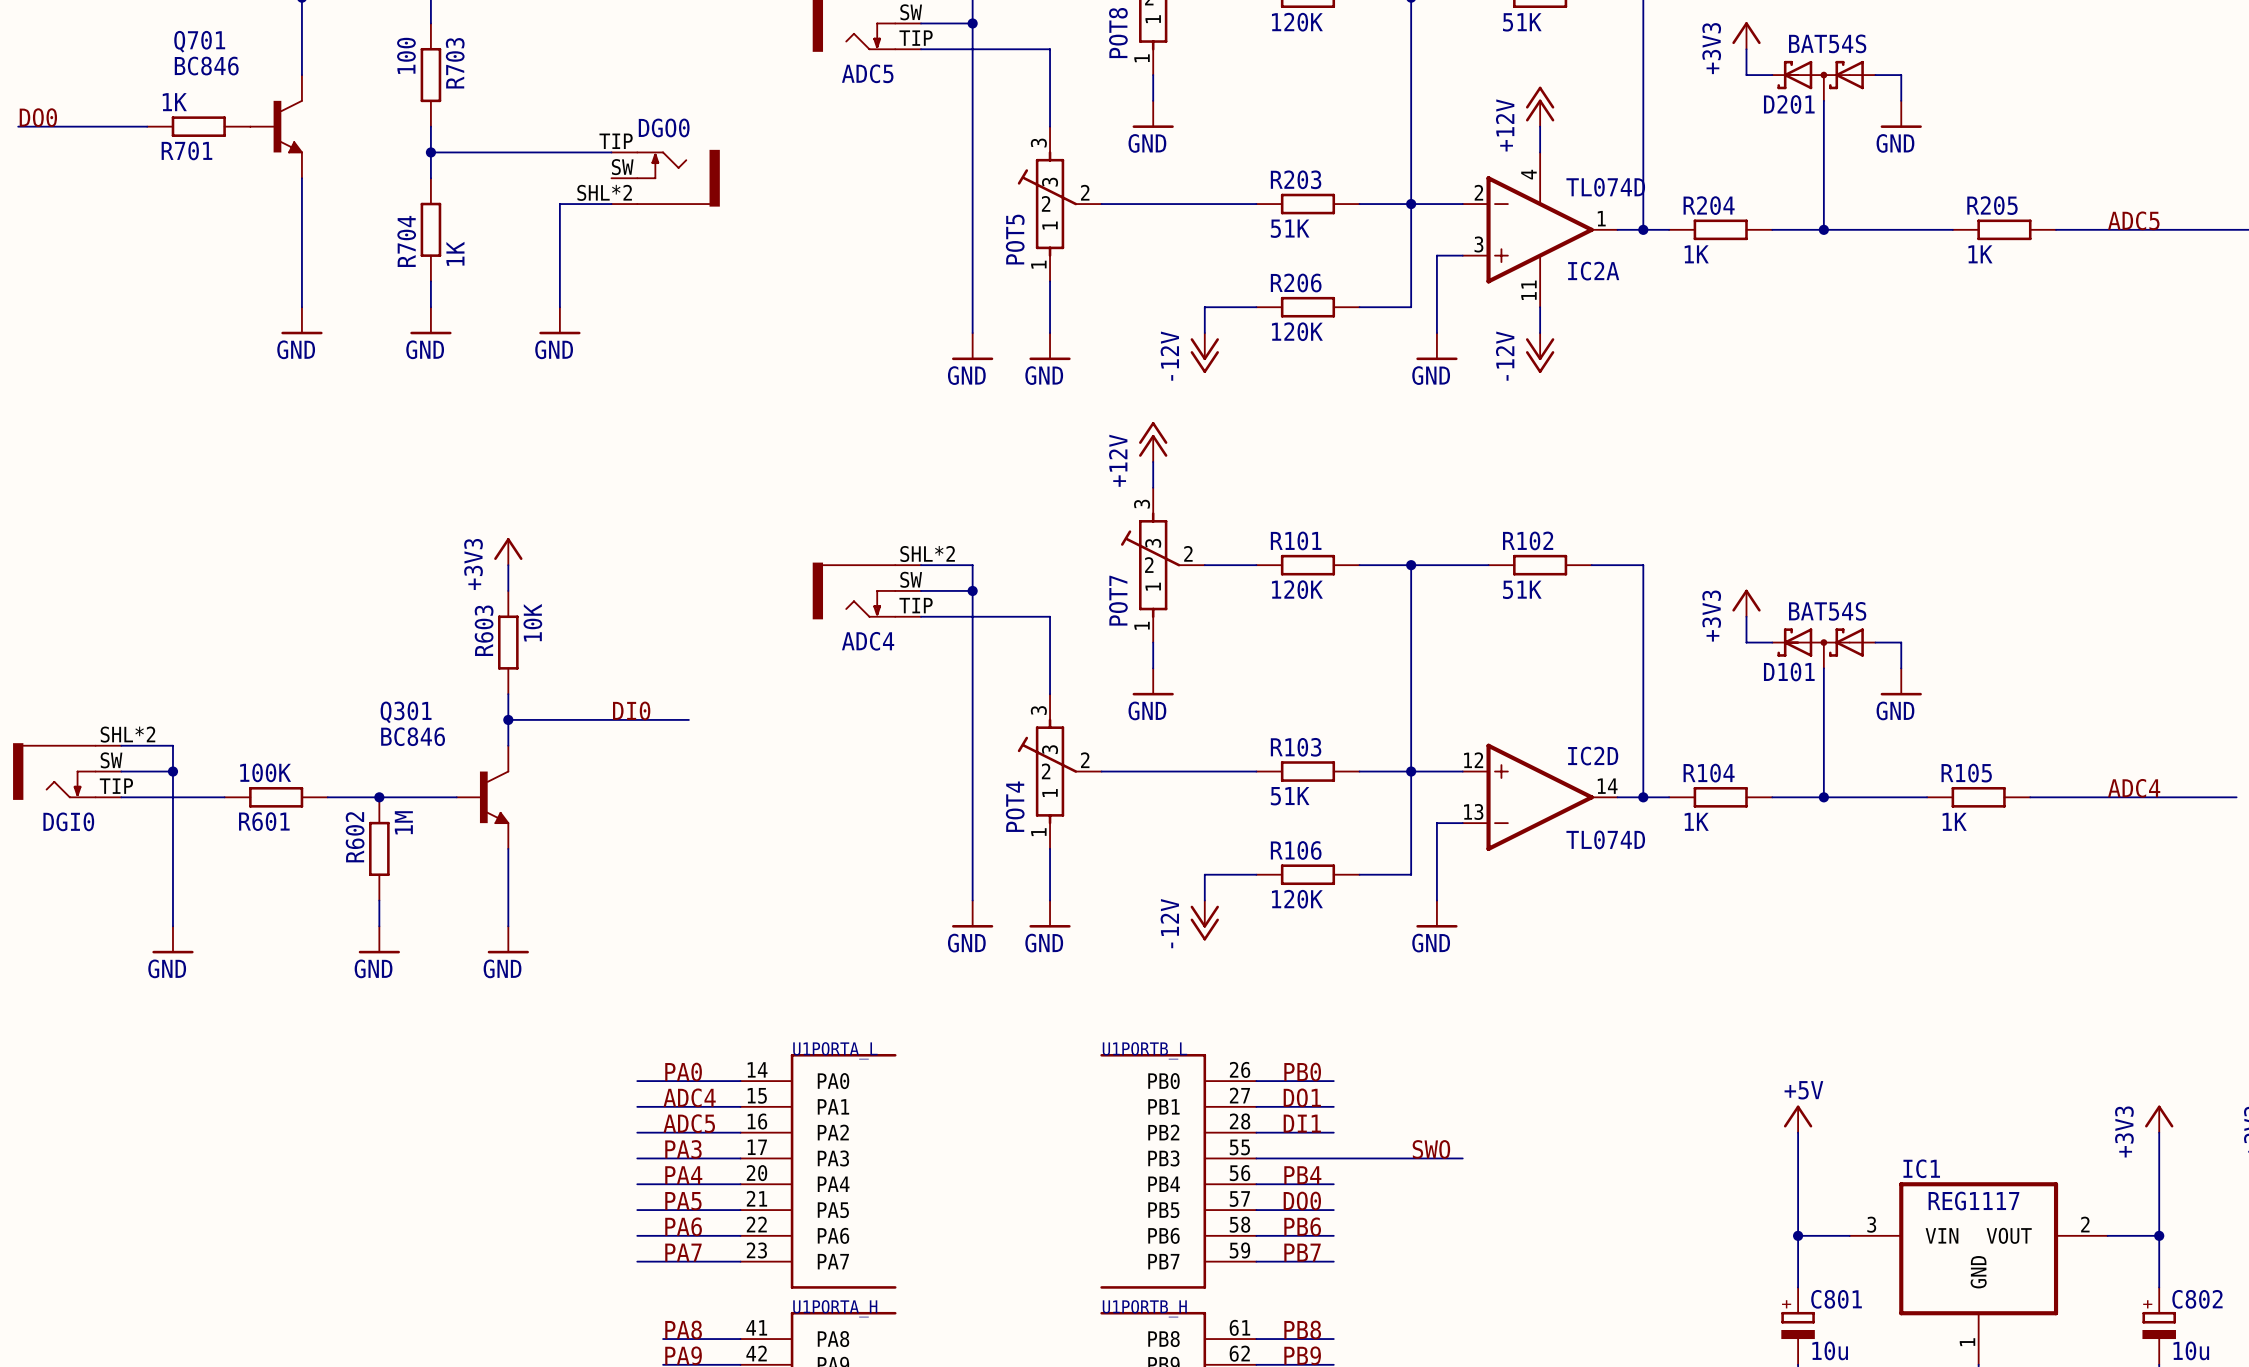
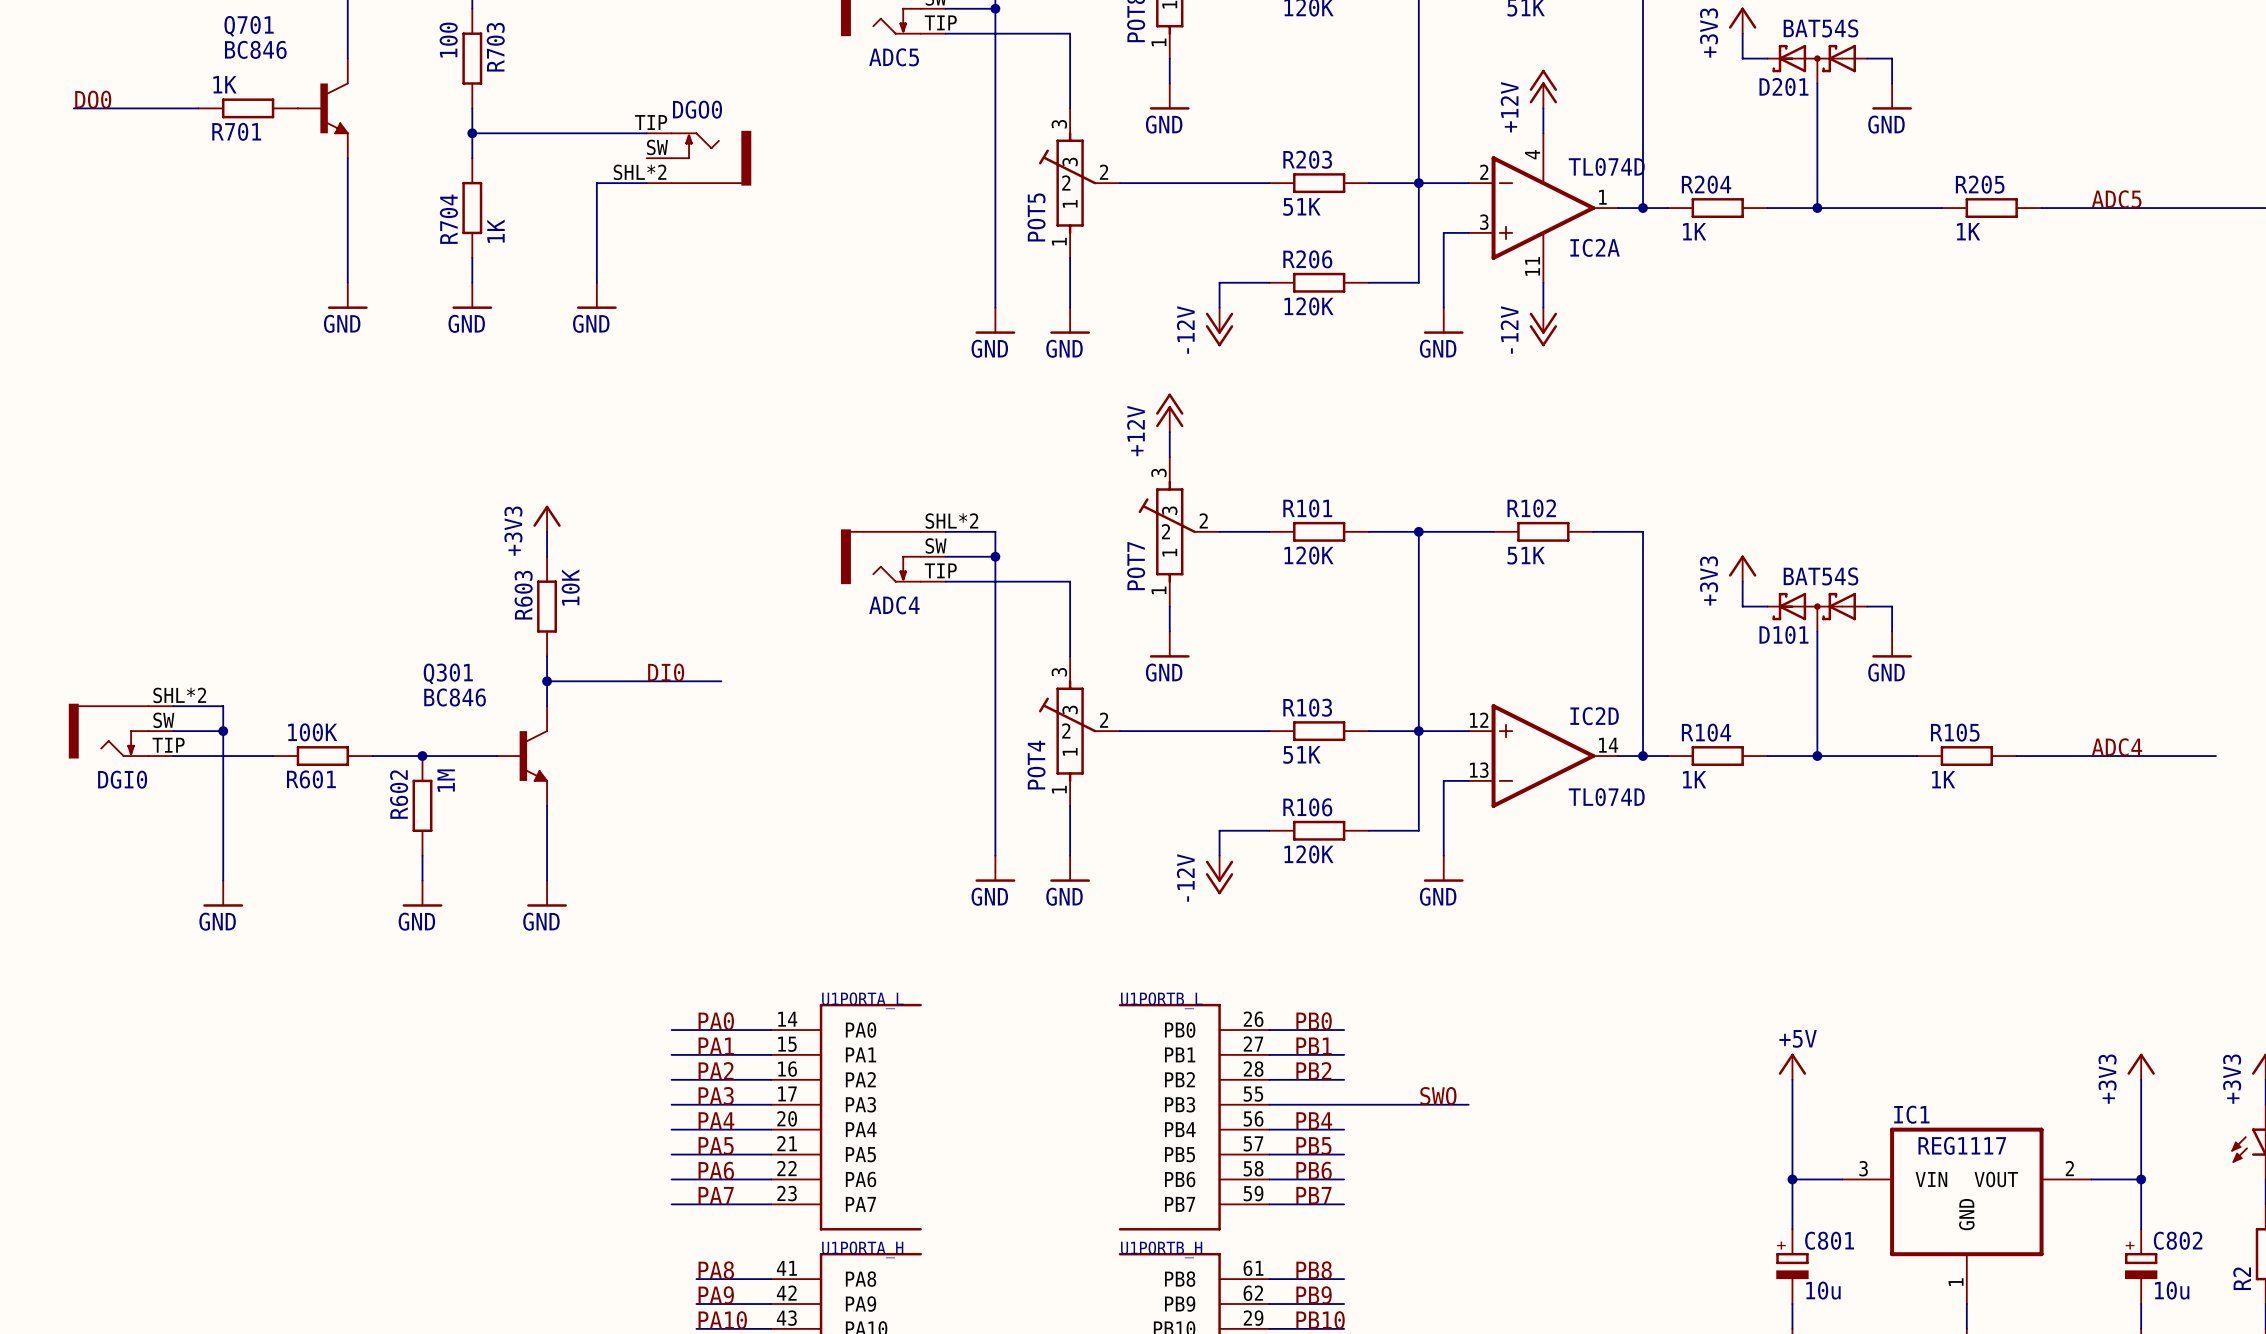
label: ADC4 (689, 1097) -> PA1 (716, 1046)
label: DO1 (1302, 1097) -> PB1 (1314, 1046)
label: ADC5 (689, 1123) -> PA2 (716, 1070)
label: DI1 (1302, 1123) -> PB2 (1313, 1070)
label: DO0 (1302, 1201) -> PB5 (1313, 1146)

